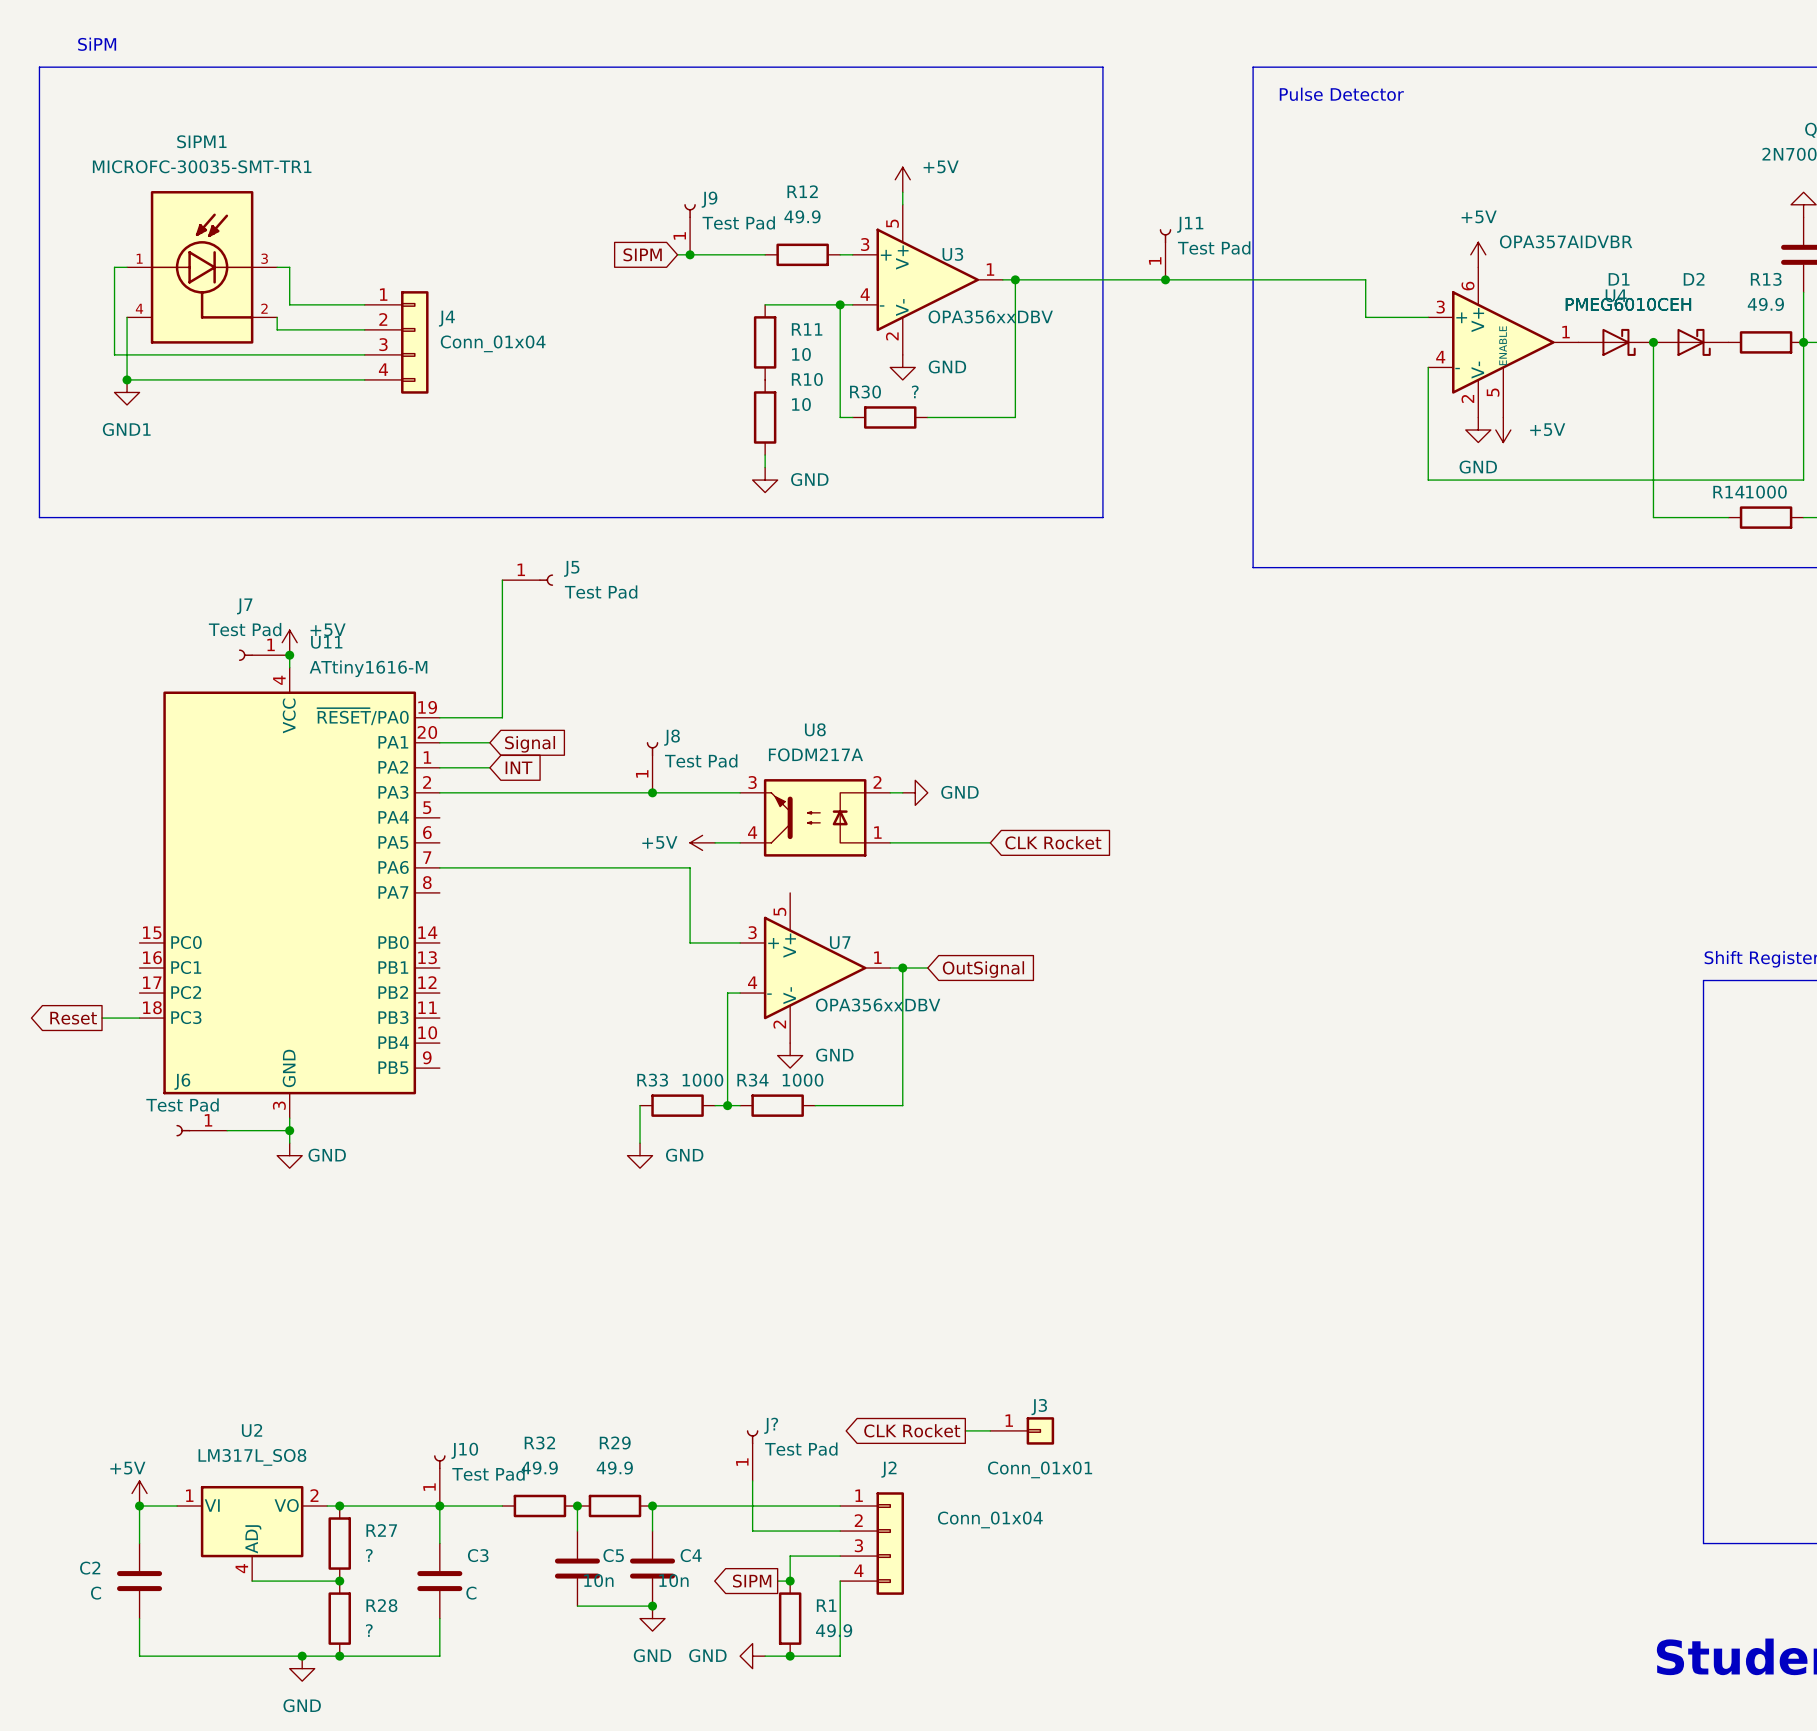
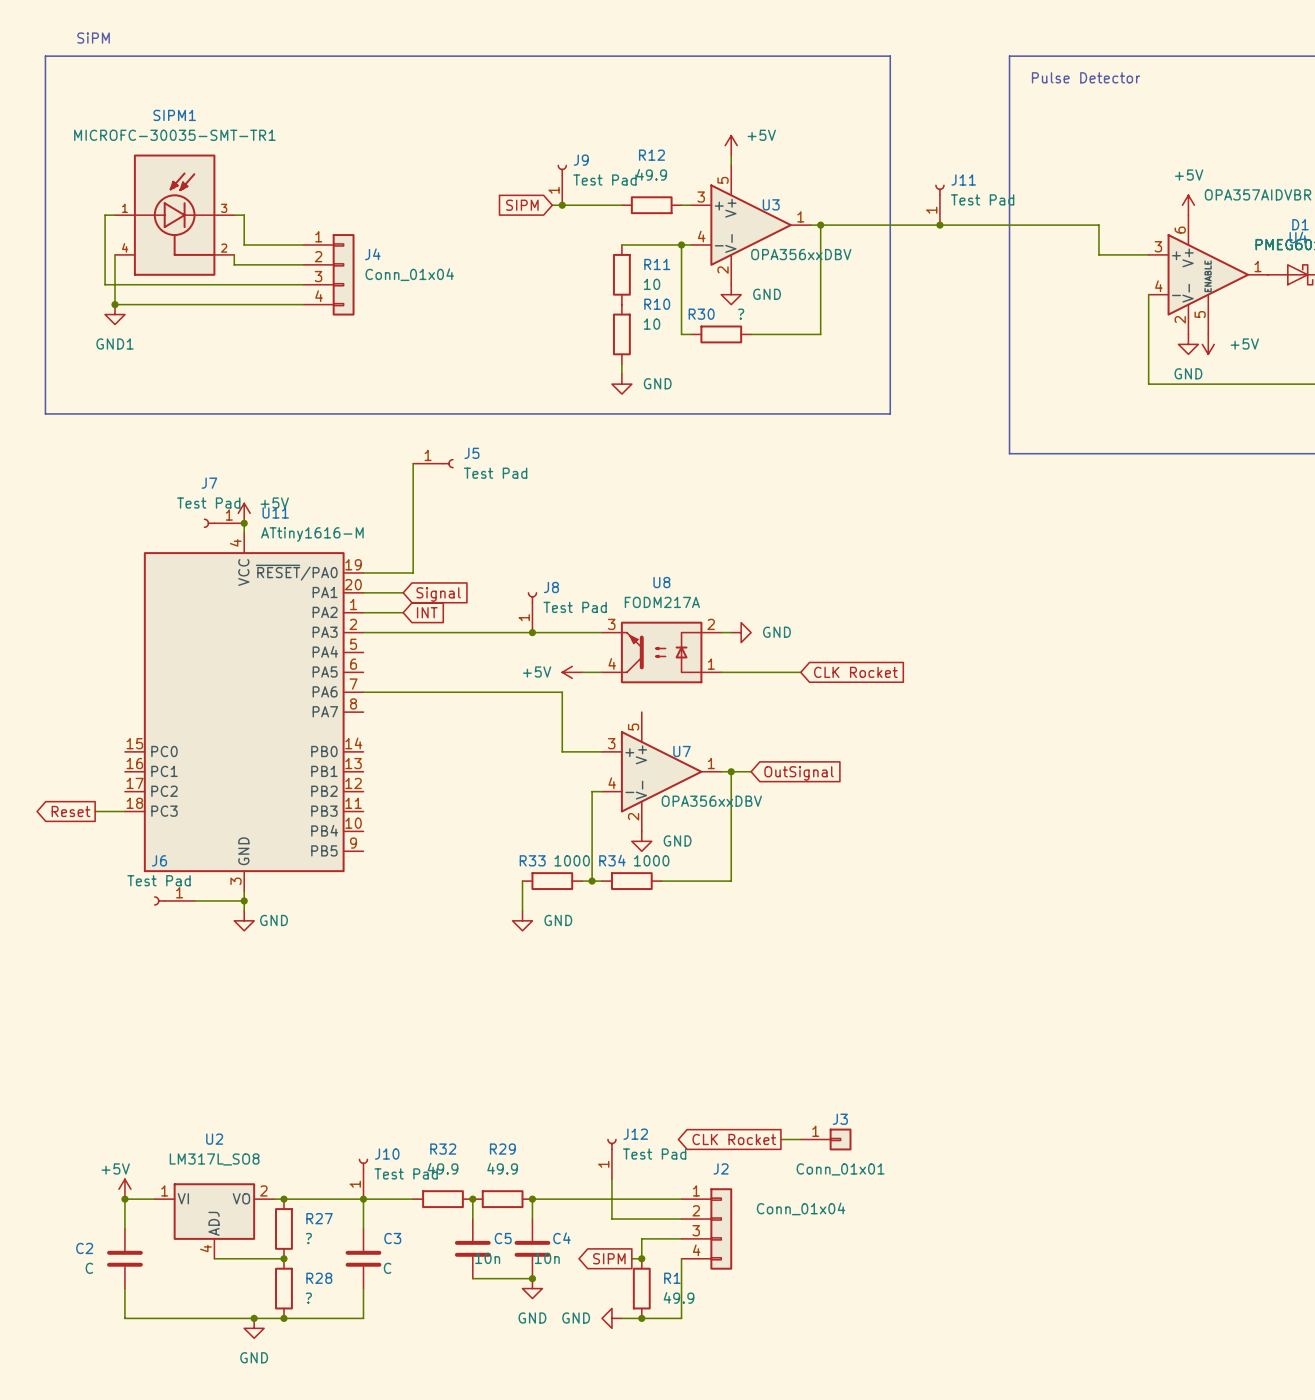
J? name: J? (771, 1425) -> J12 (635, 1134)

